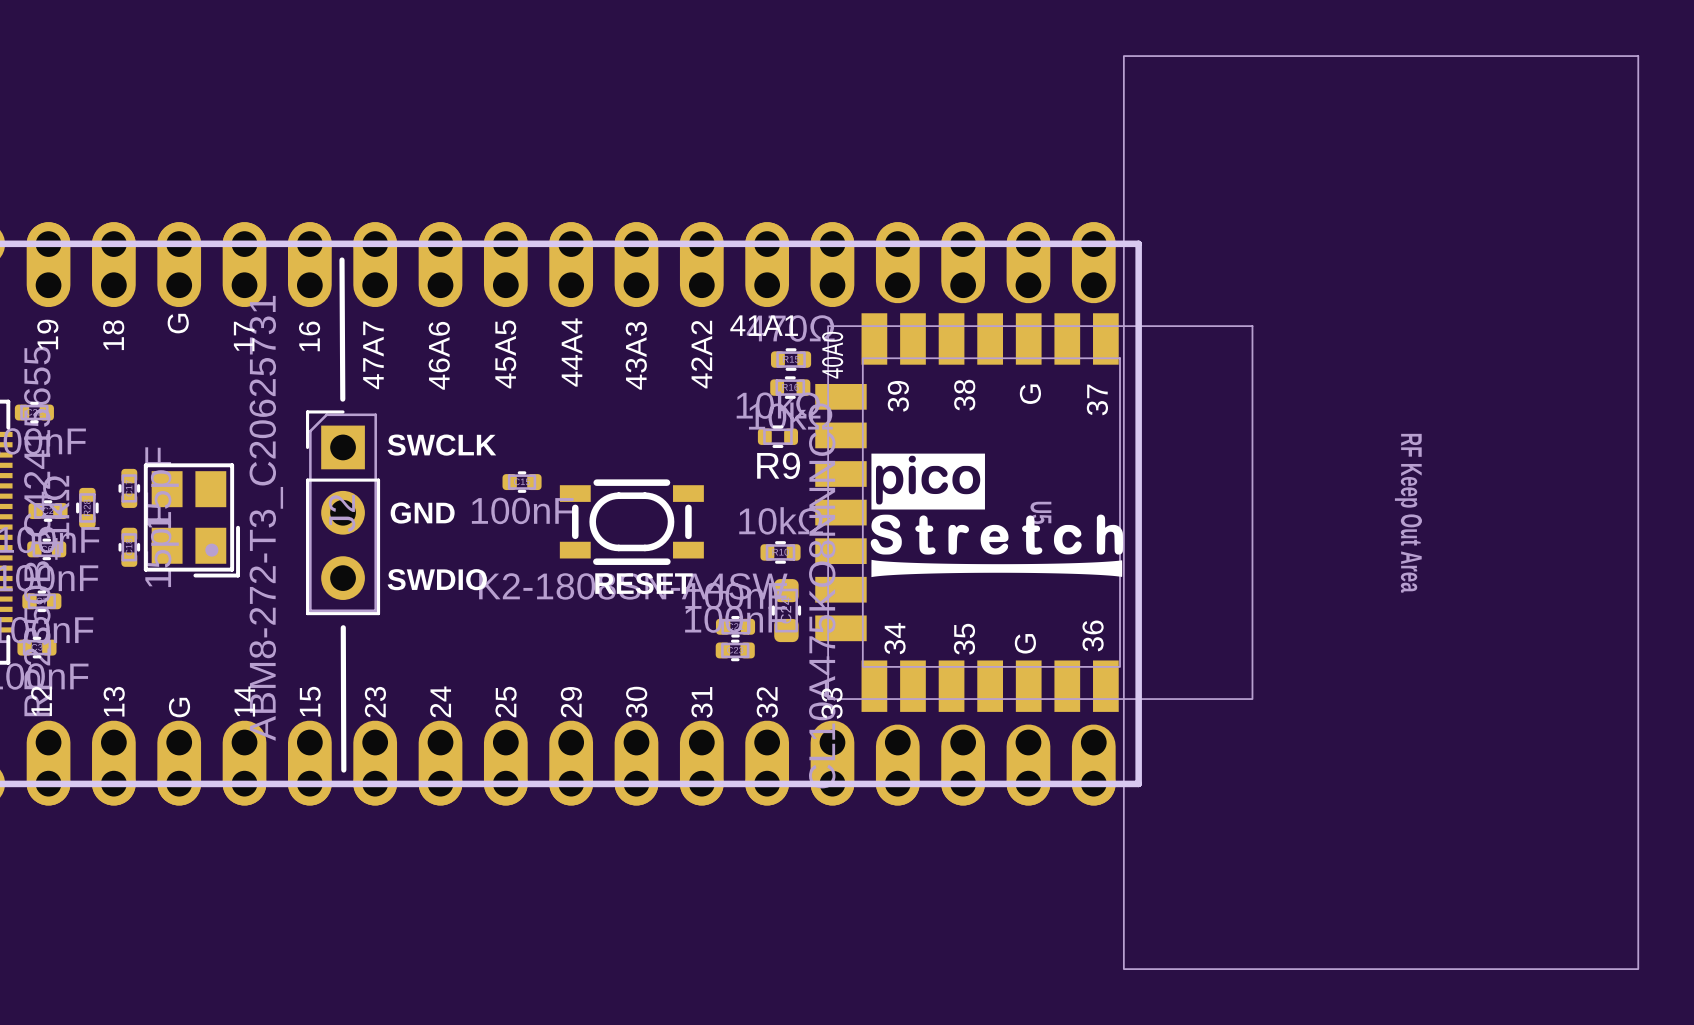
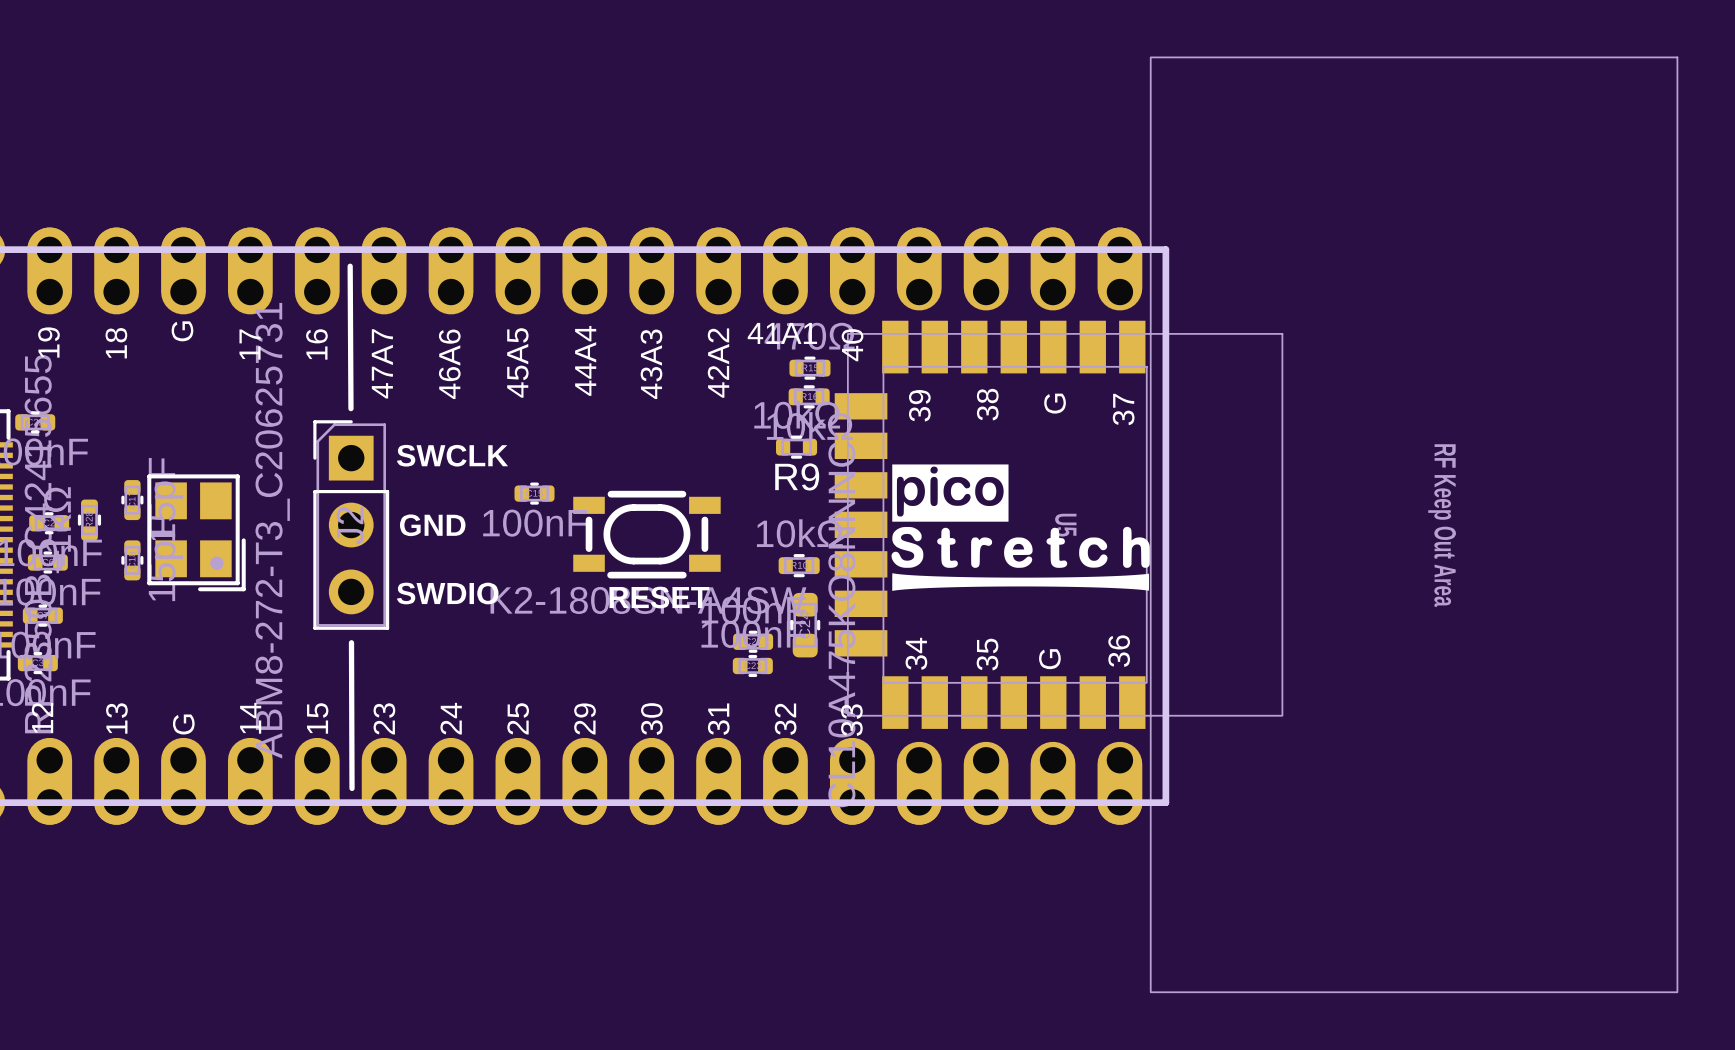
text: 40A0 (832, 355) -> 40 (852, 345)

